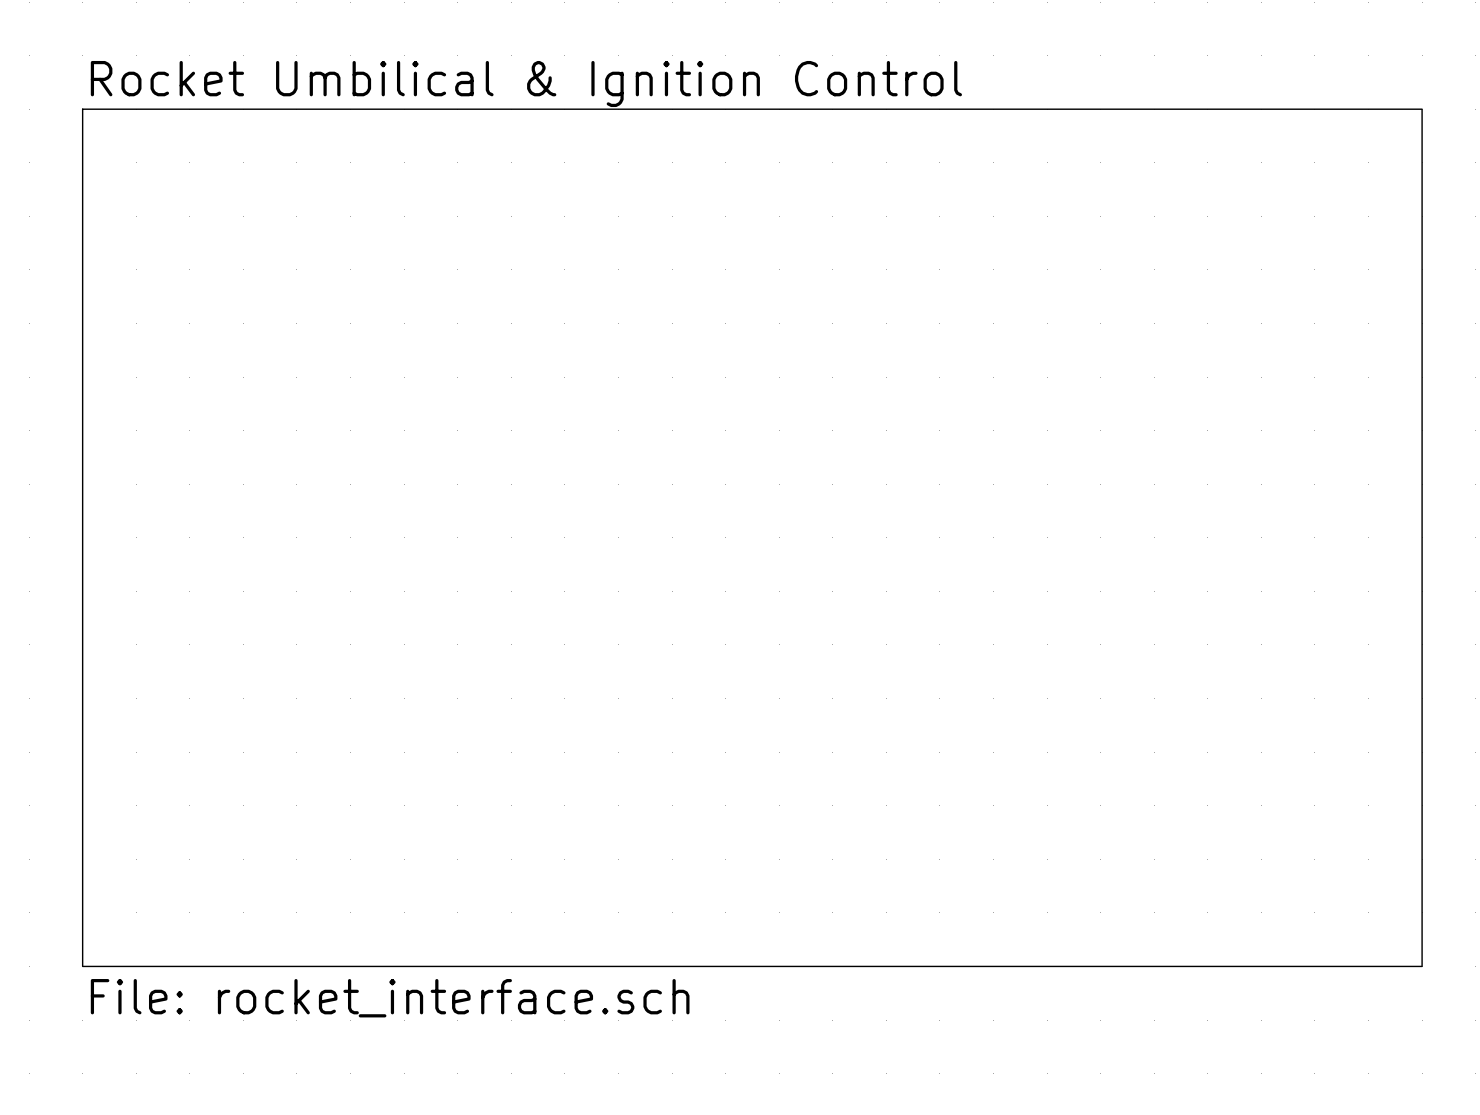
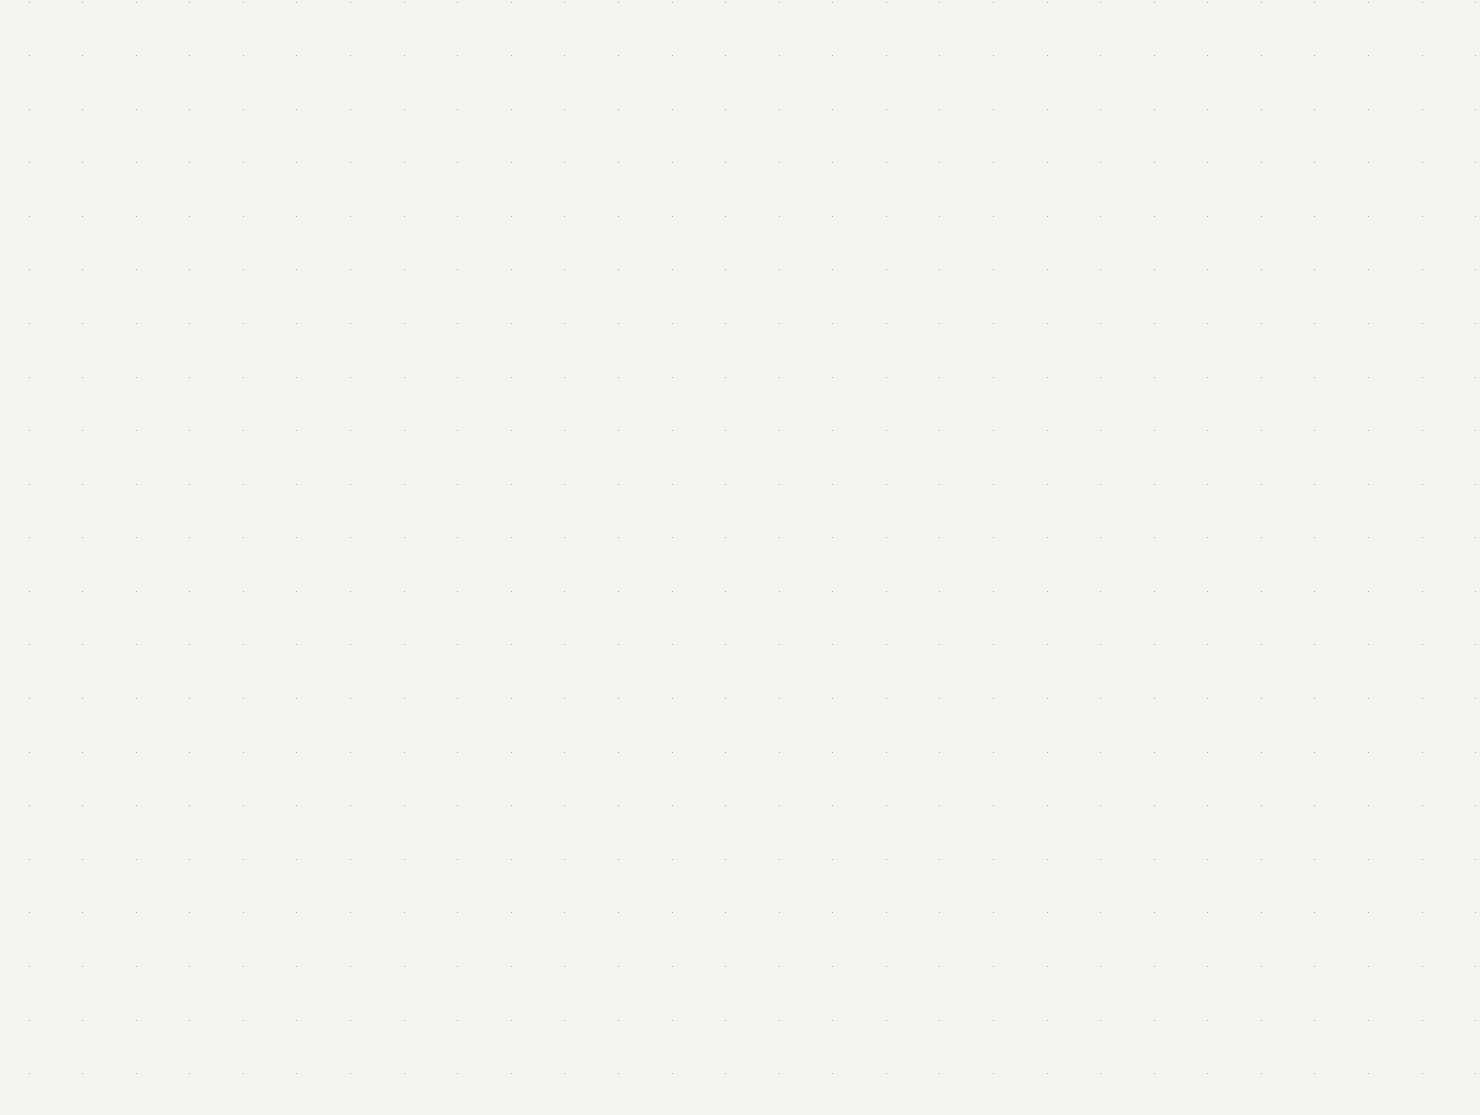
sheet Rocket Umbilical & Ignition Control: File: rocket_interface.sch (752, 537) -> none

